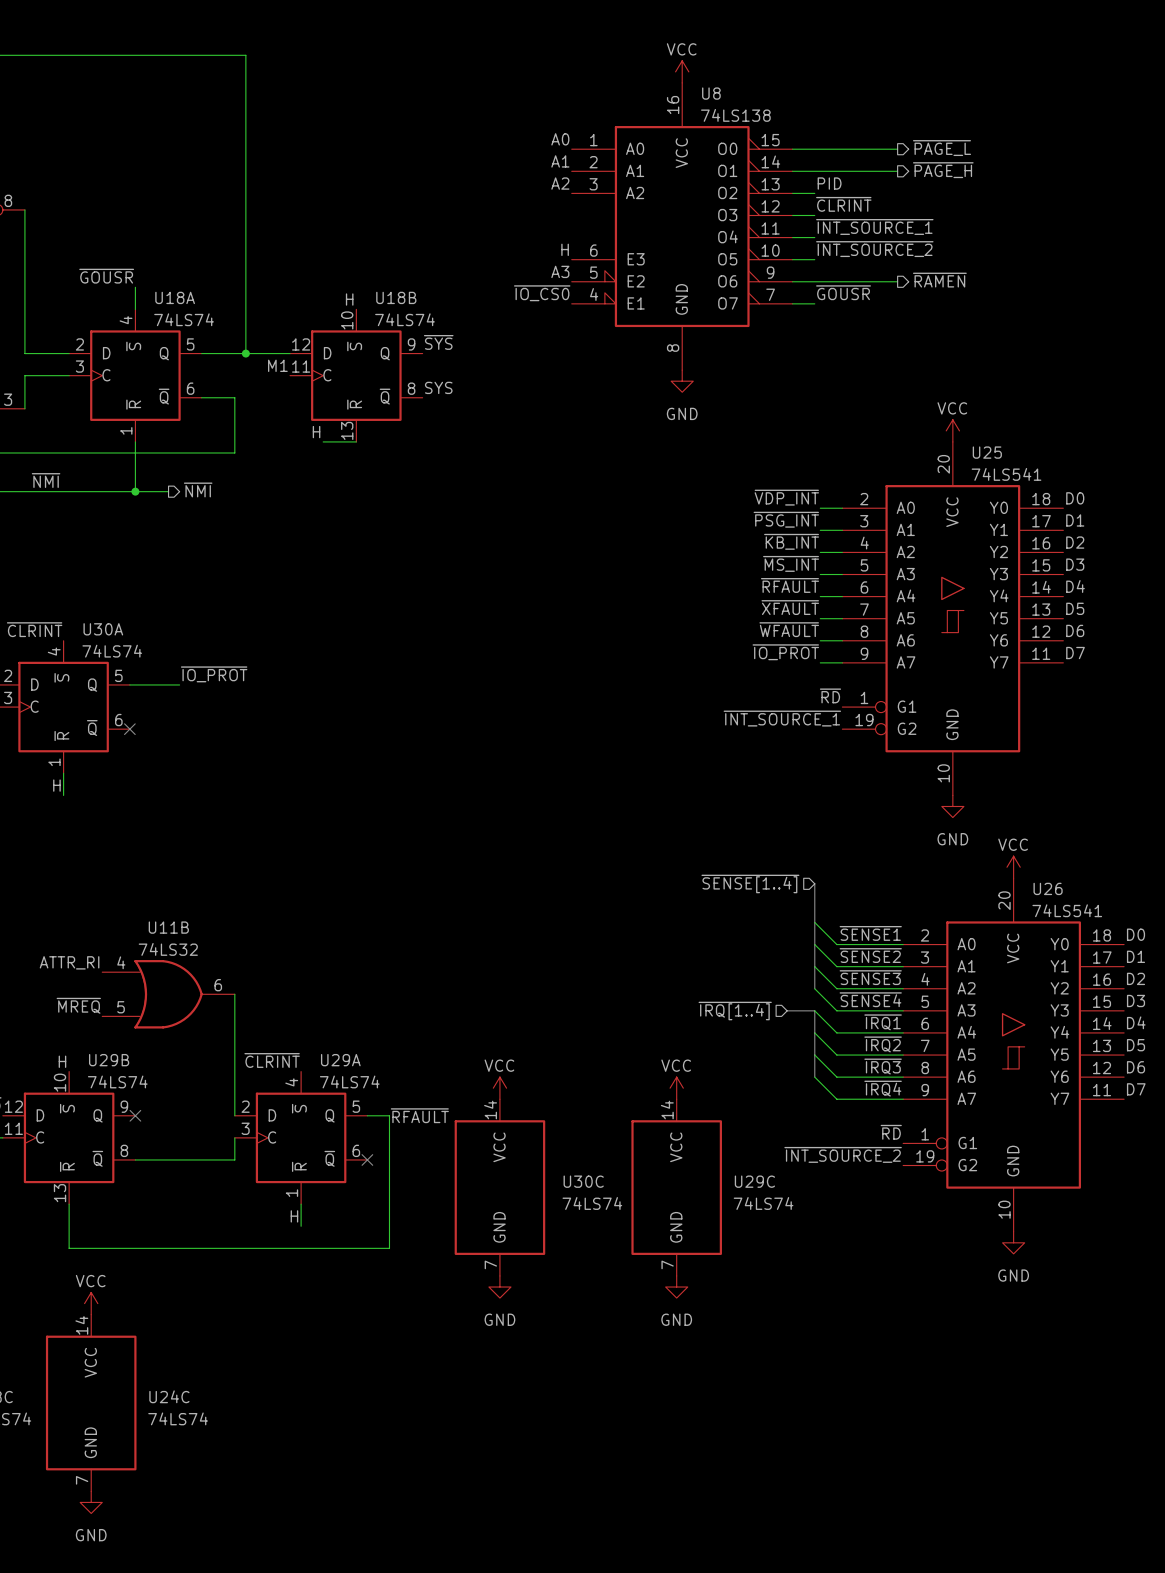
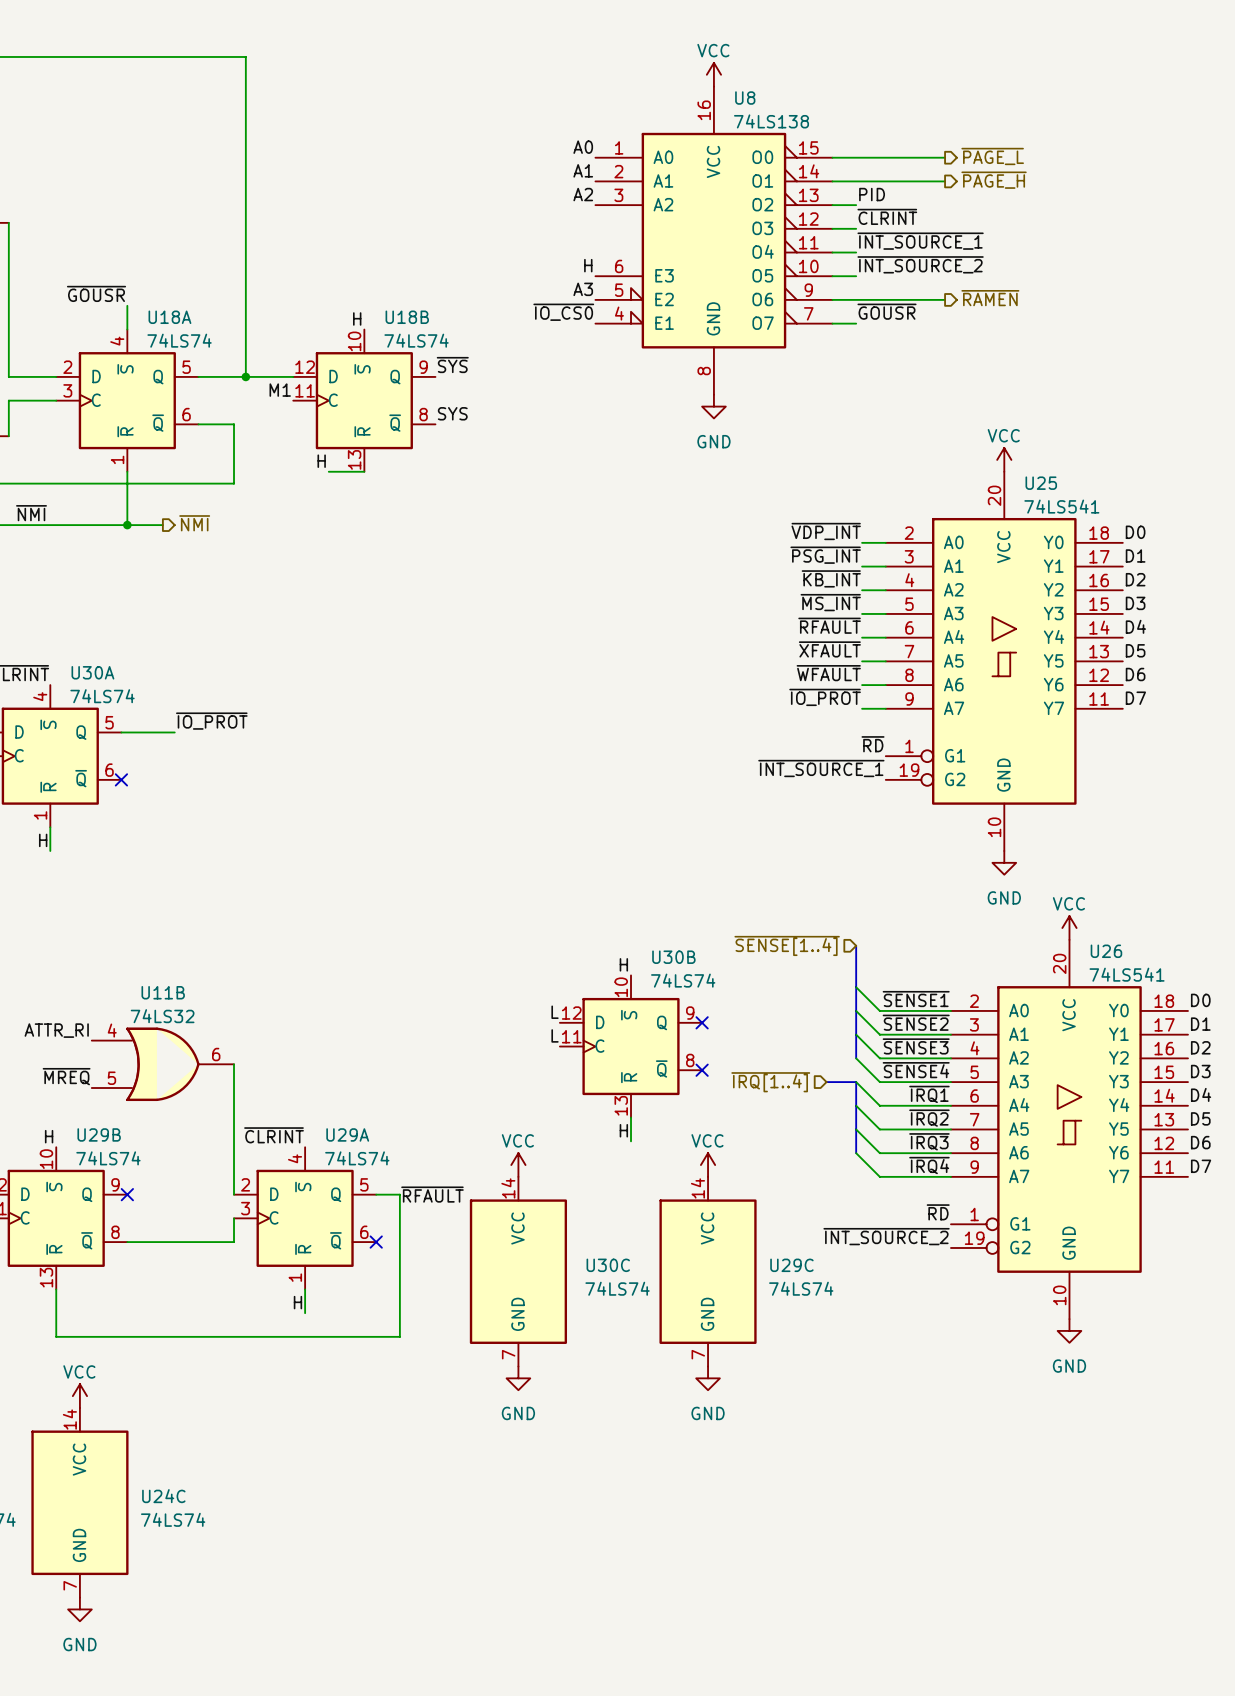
label: none -> H (623, 964)
label: none -> L (555, 1012)
no-connect mark: none -> (702, 1022)
label: none -> L (555, 1035)
U30B: none -> 74LS74 (631, 1046)
no-connect mark: none -> (702, 1070)
wire: none -> (631, 1117) (631, 1141)
label: none -> H (623, 1130)

